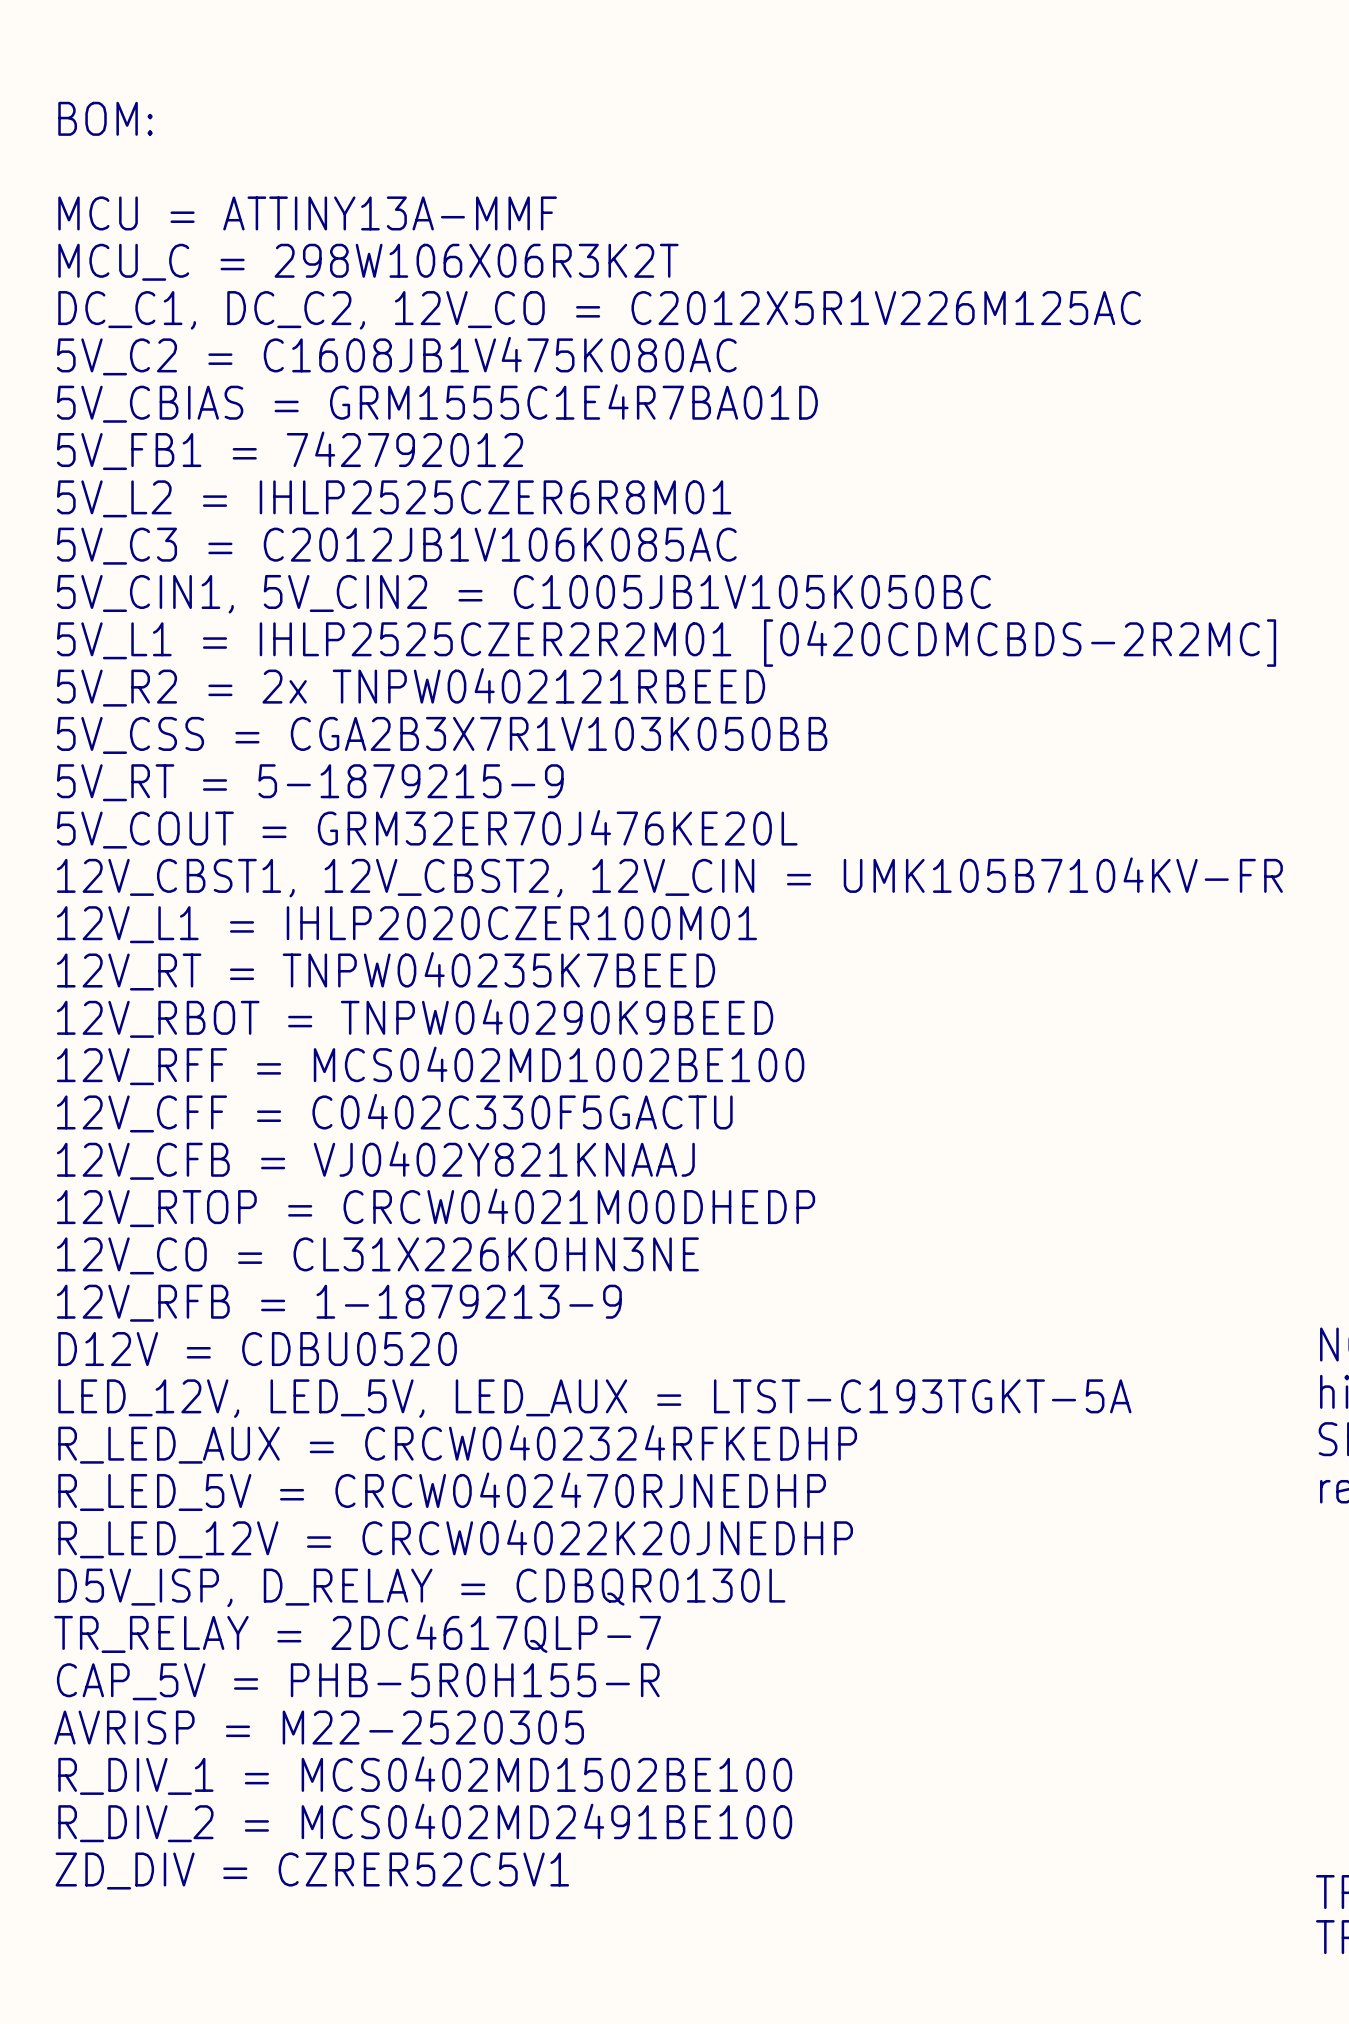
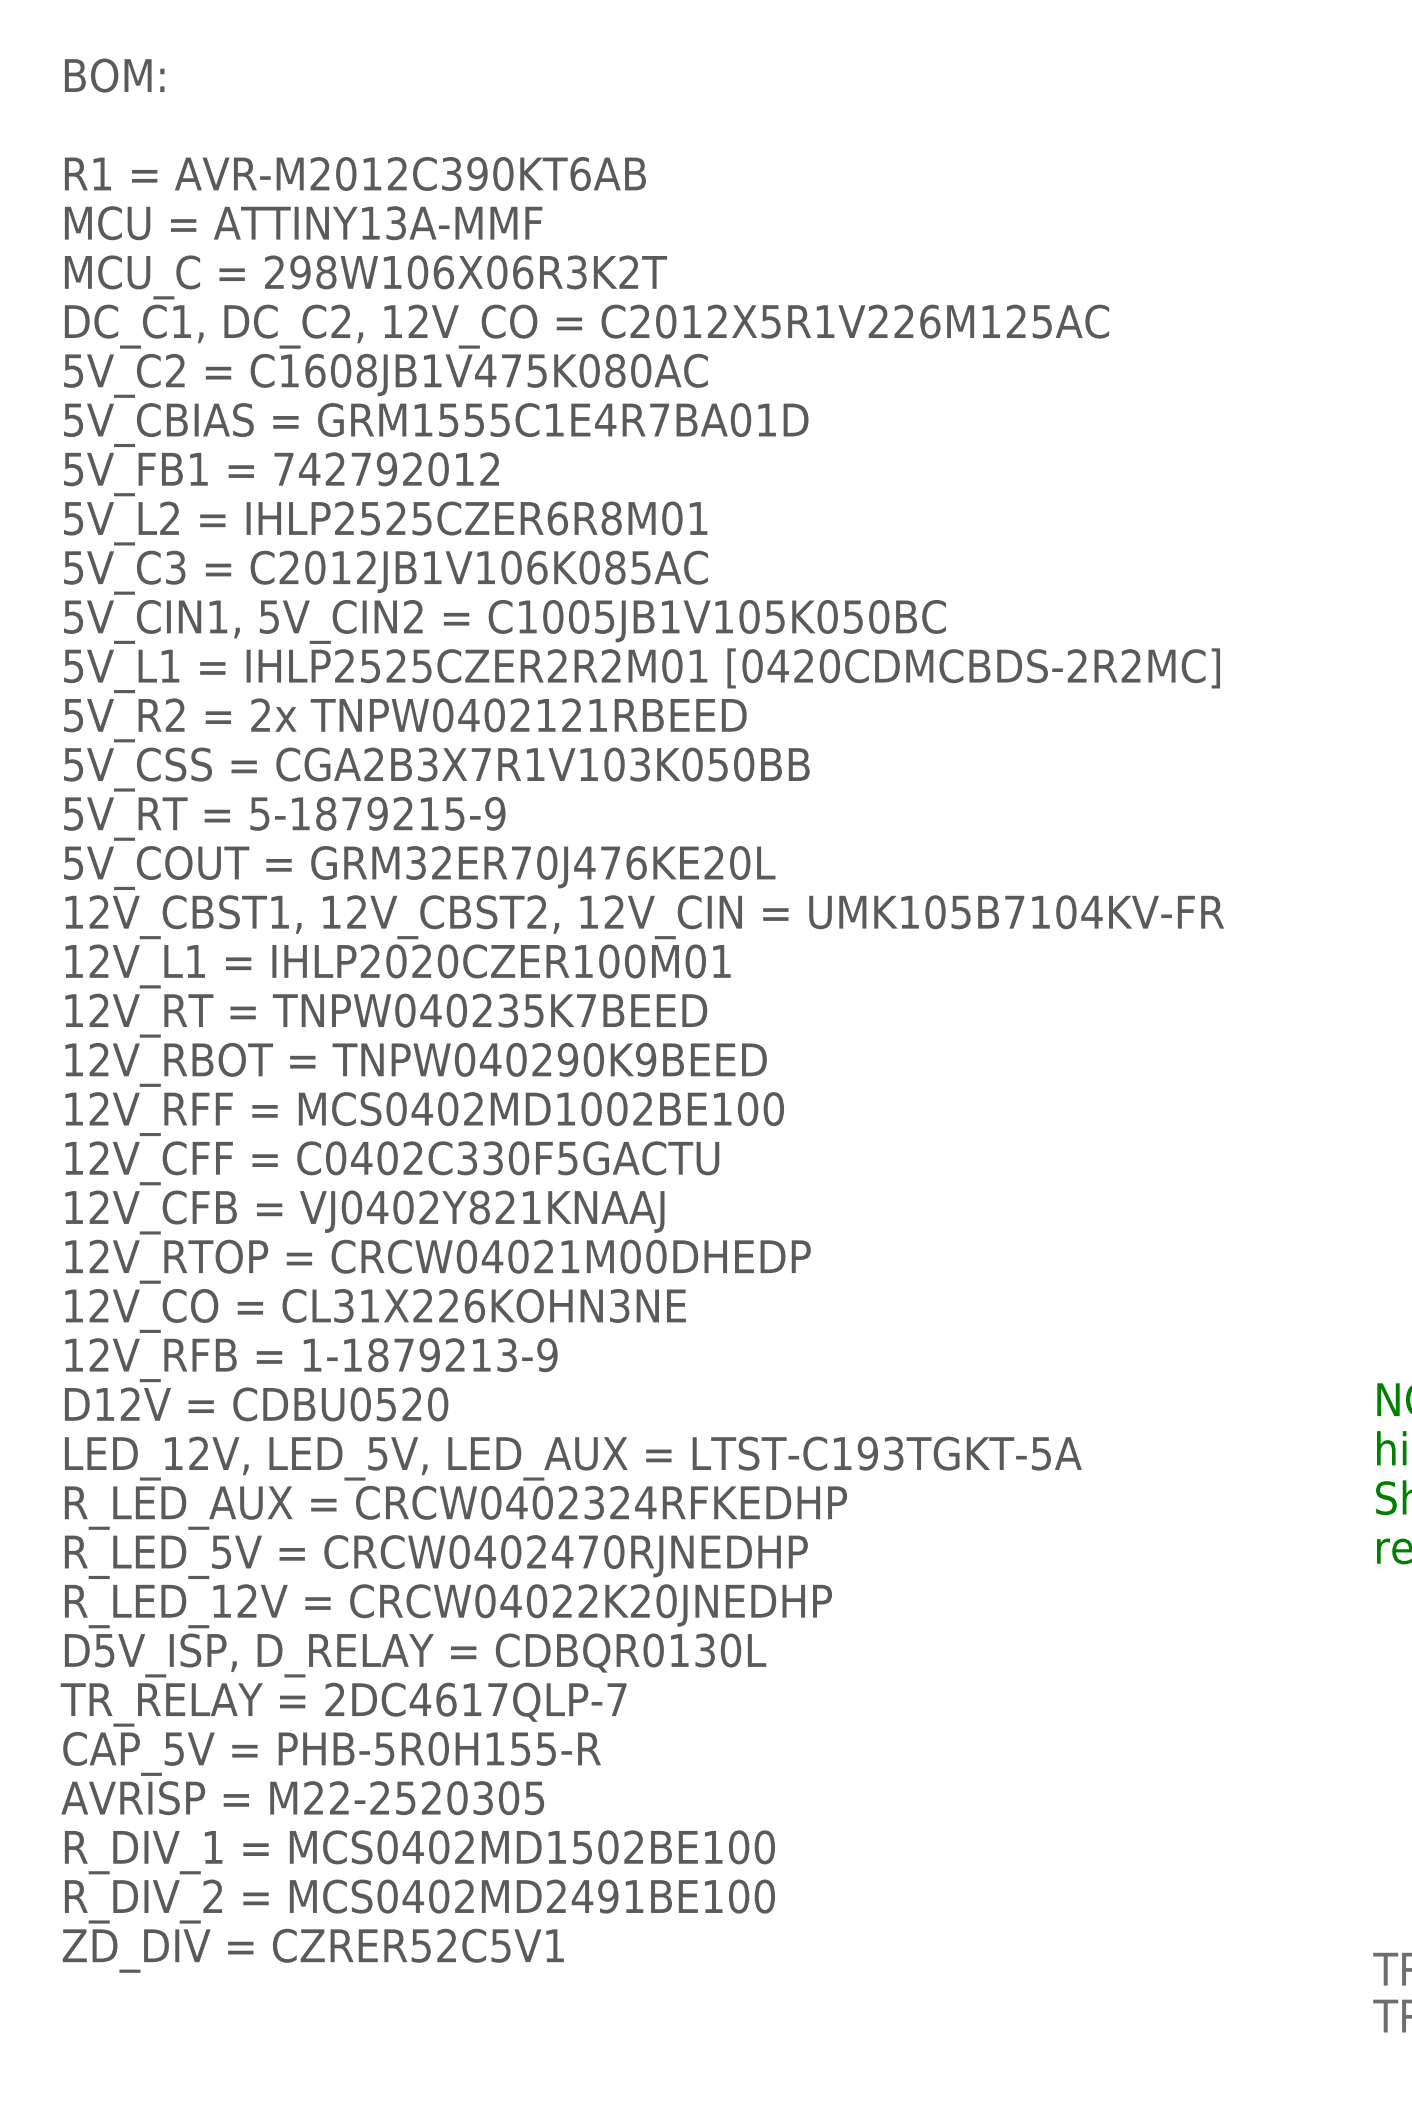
text position: BOM: (105, 118) -> BOM: (114, 75)
text: none -> R1 = AVR-M2012C390KT6AB (355, 174)

